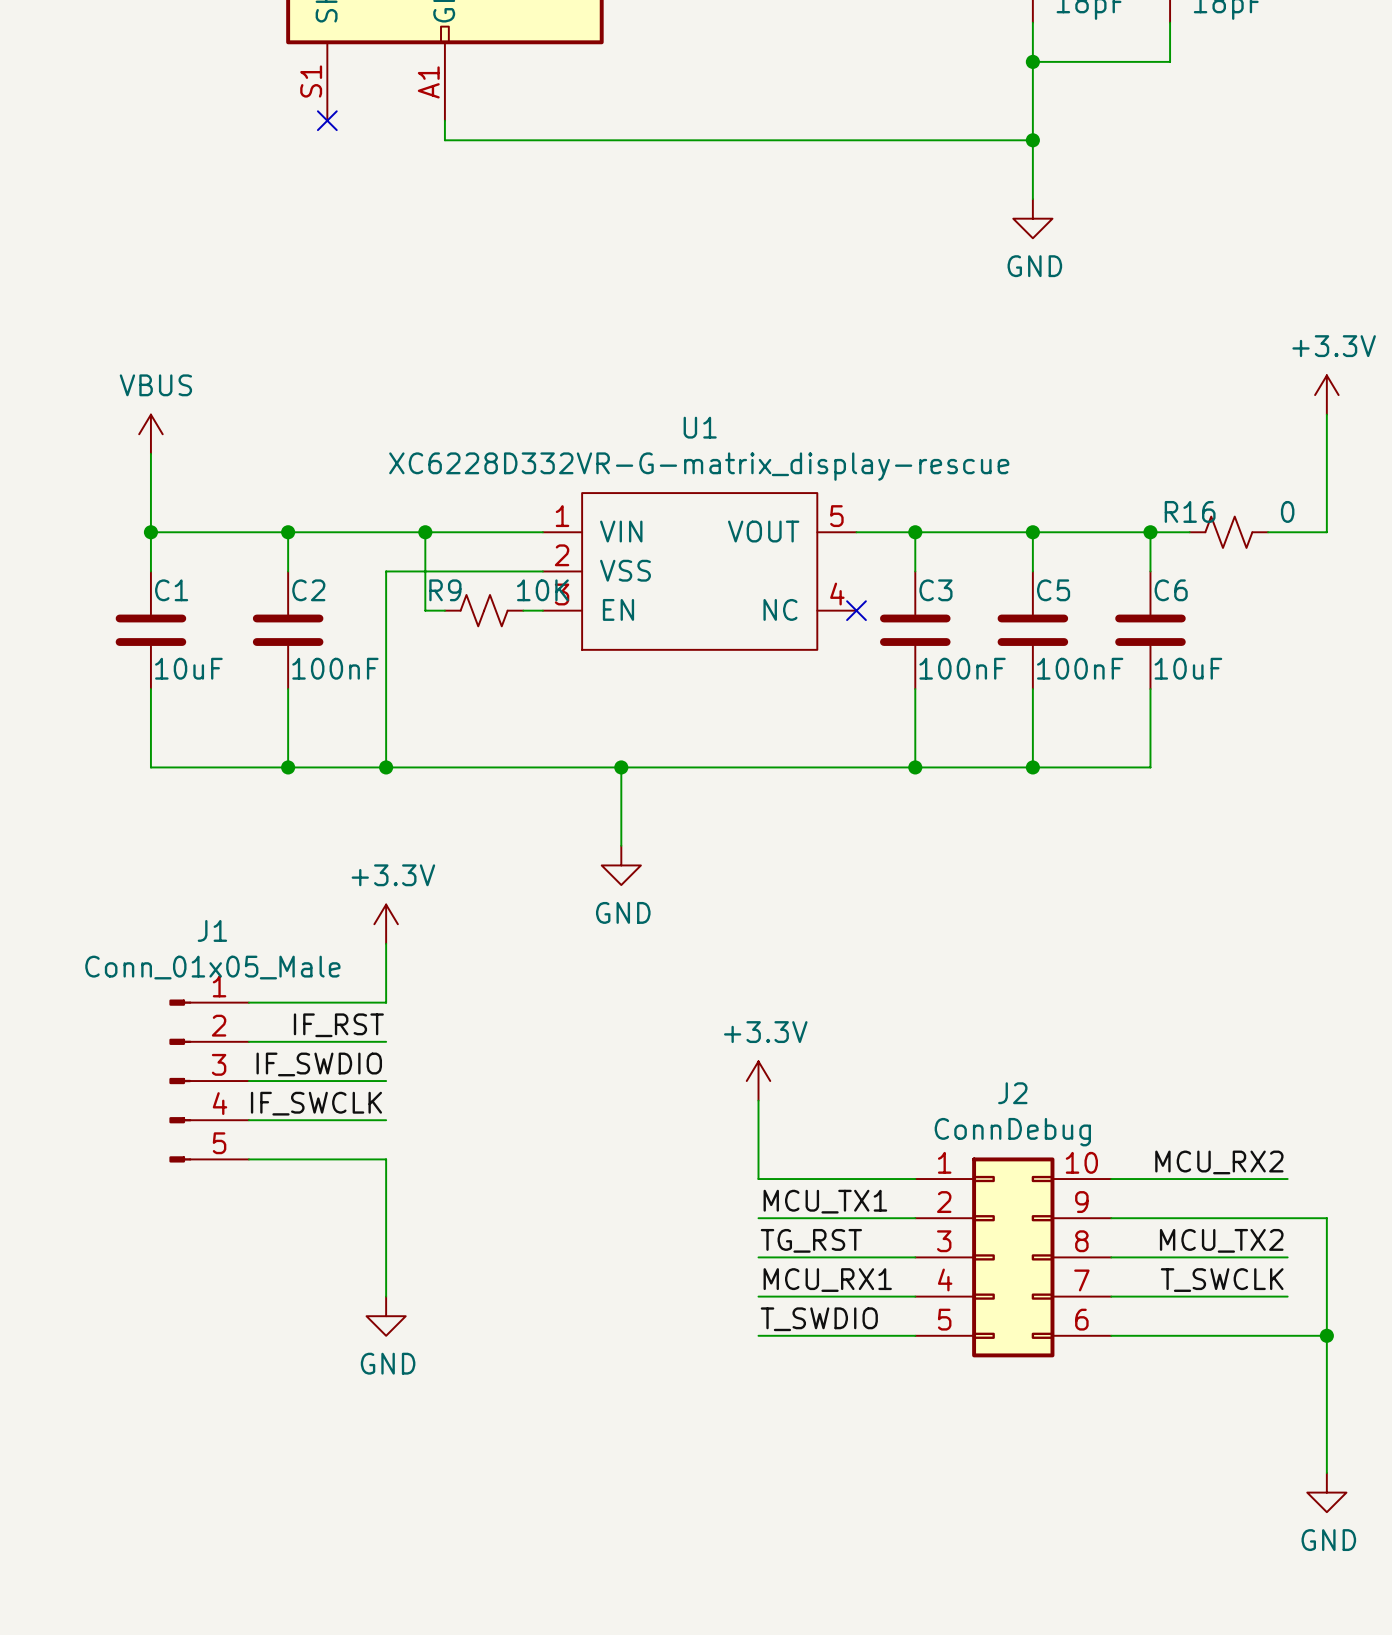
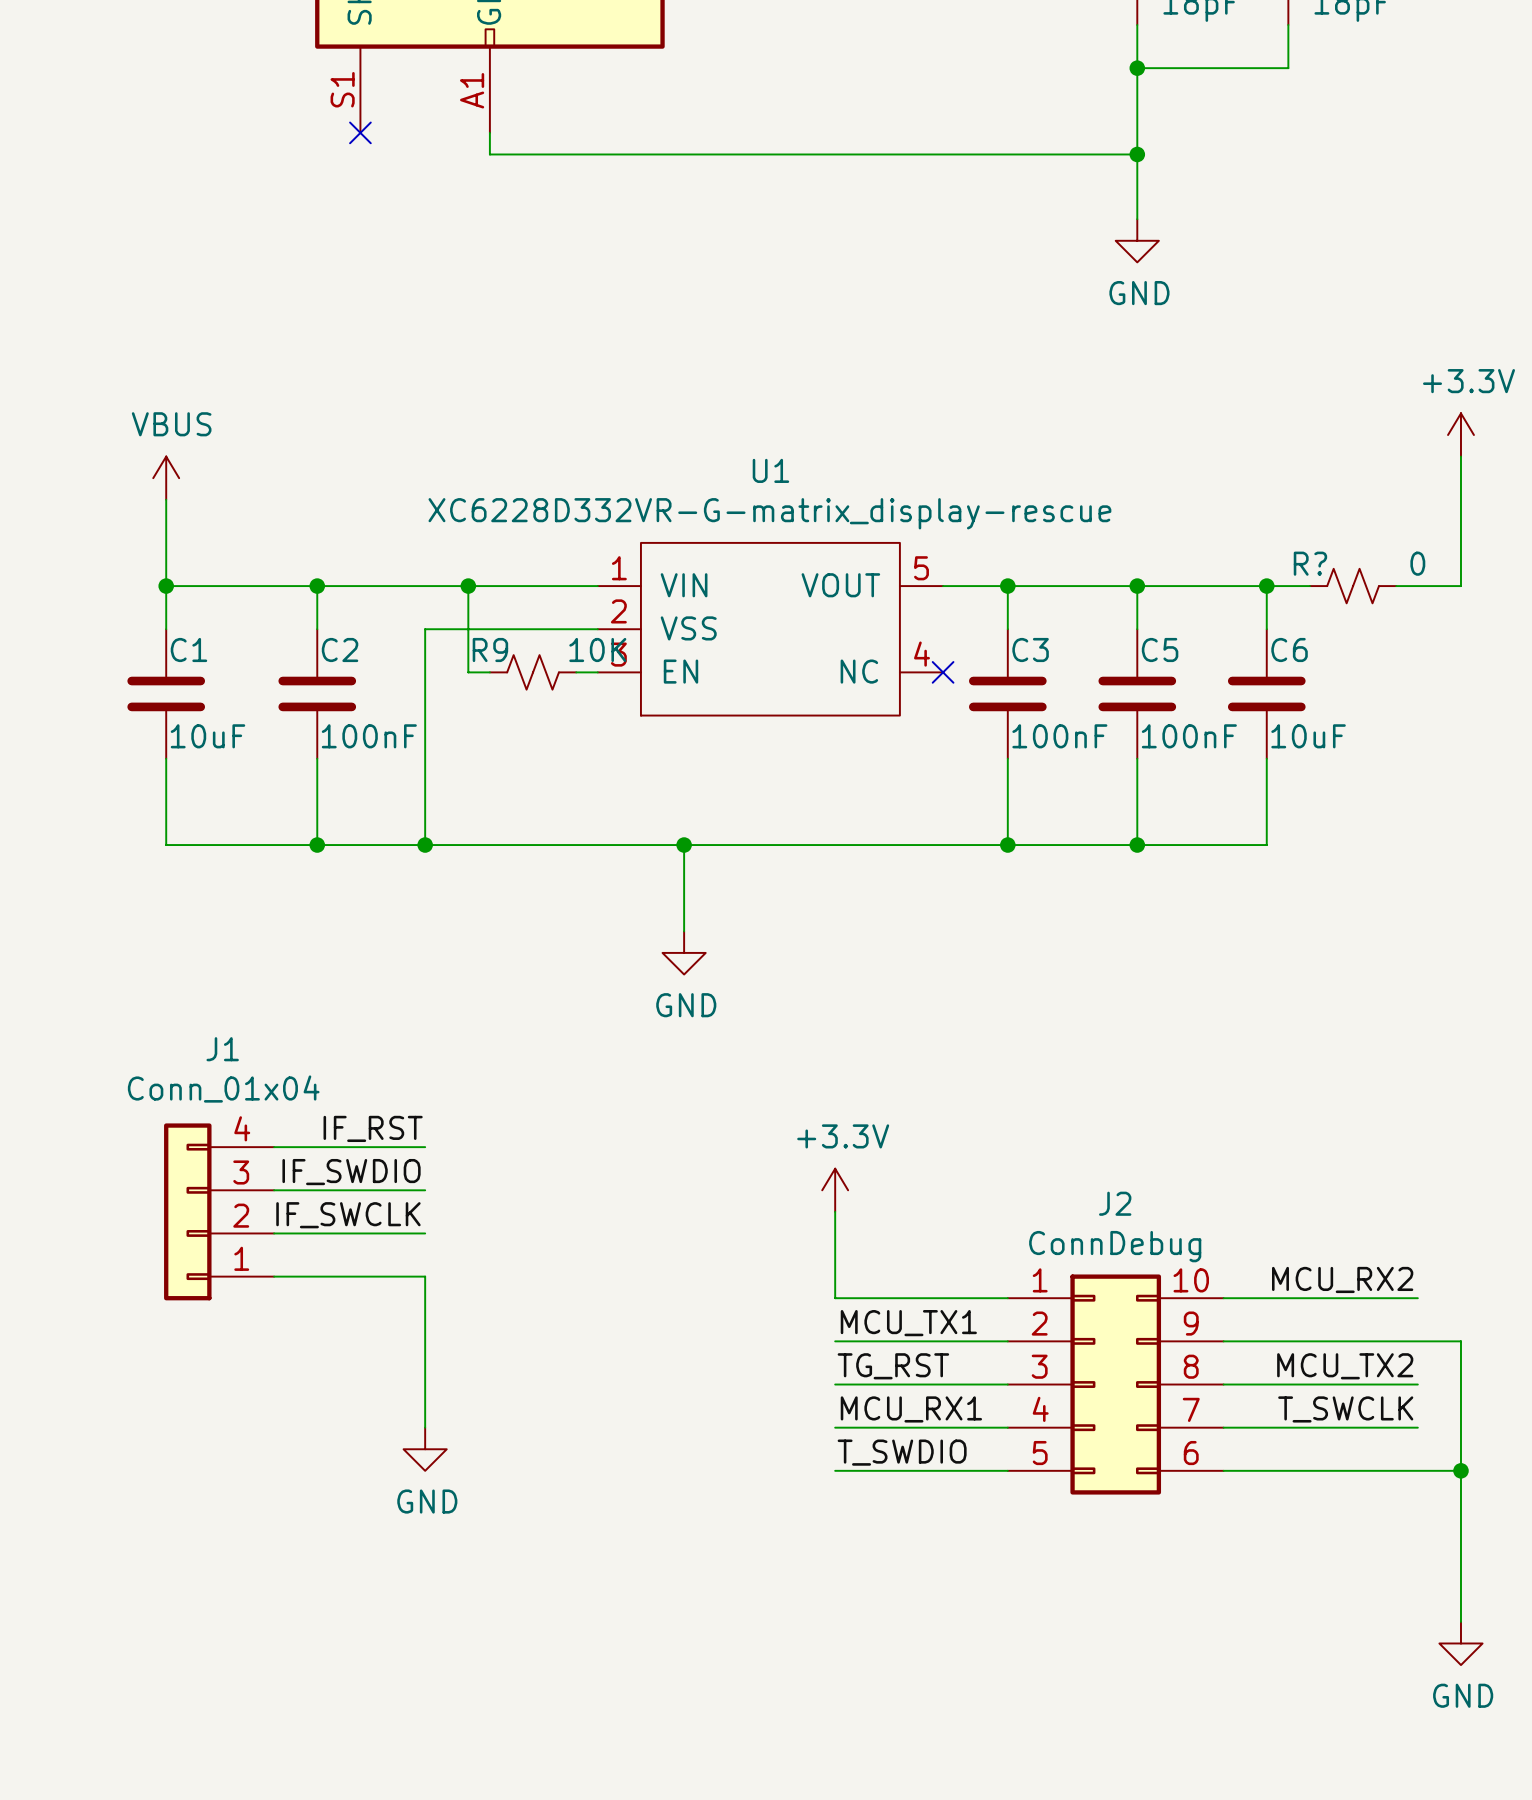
R16 name: R16 (1190, 511) -> R? (1310, 563)
power symbol: +3.3V (386, 924) -> none
wire: (386, 943) (386, 1002) (248, 1002) -> none
J1 value: Conn_01x05_Male (212, 967) -> Conn_01x04 (223, 1089)
J1 symbol: [169, 999, 249, 1163] -> [164, 1123, 275, 1301]

